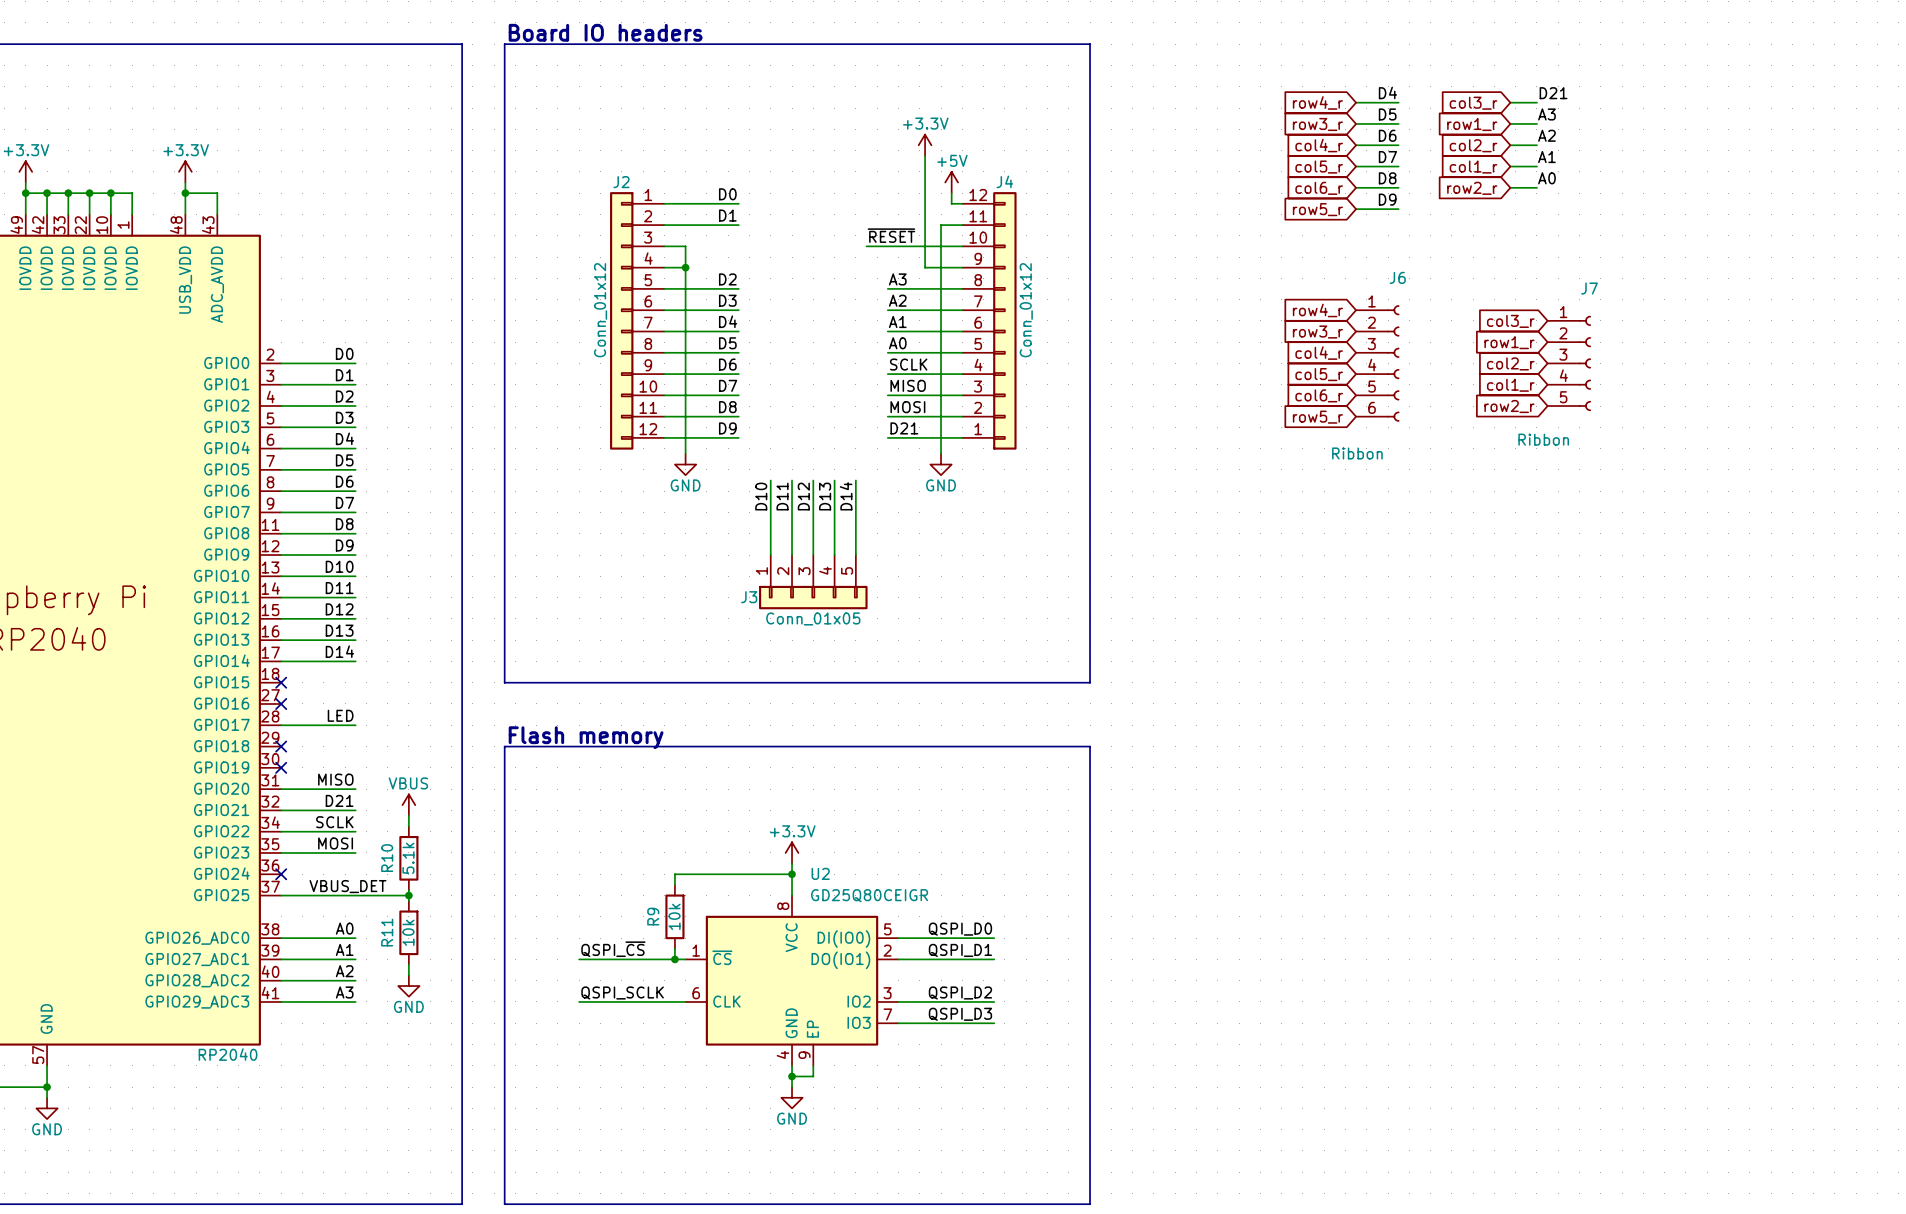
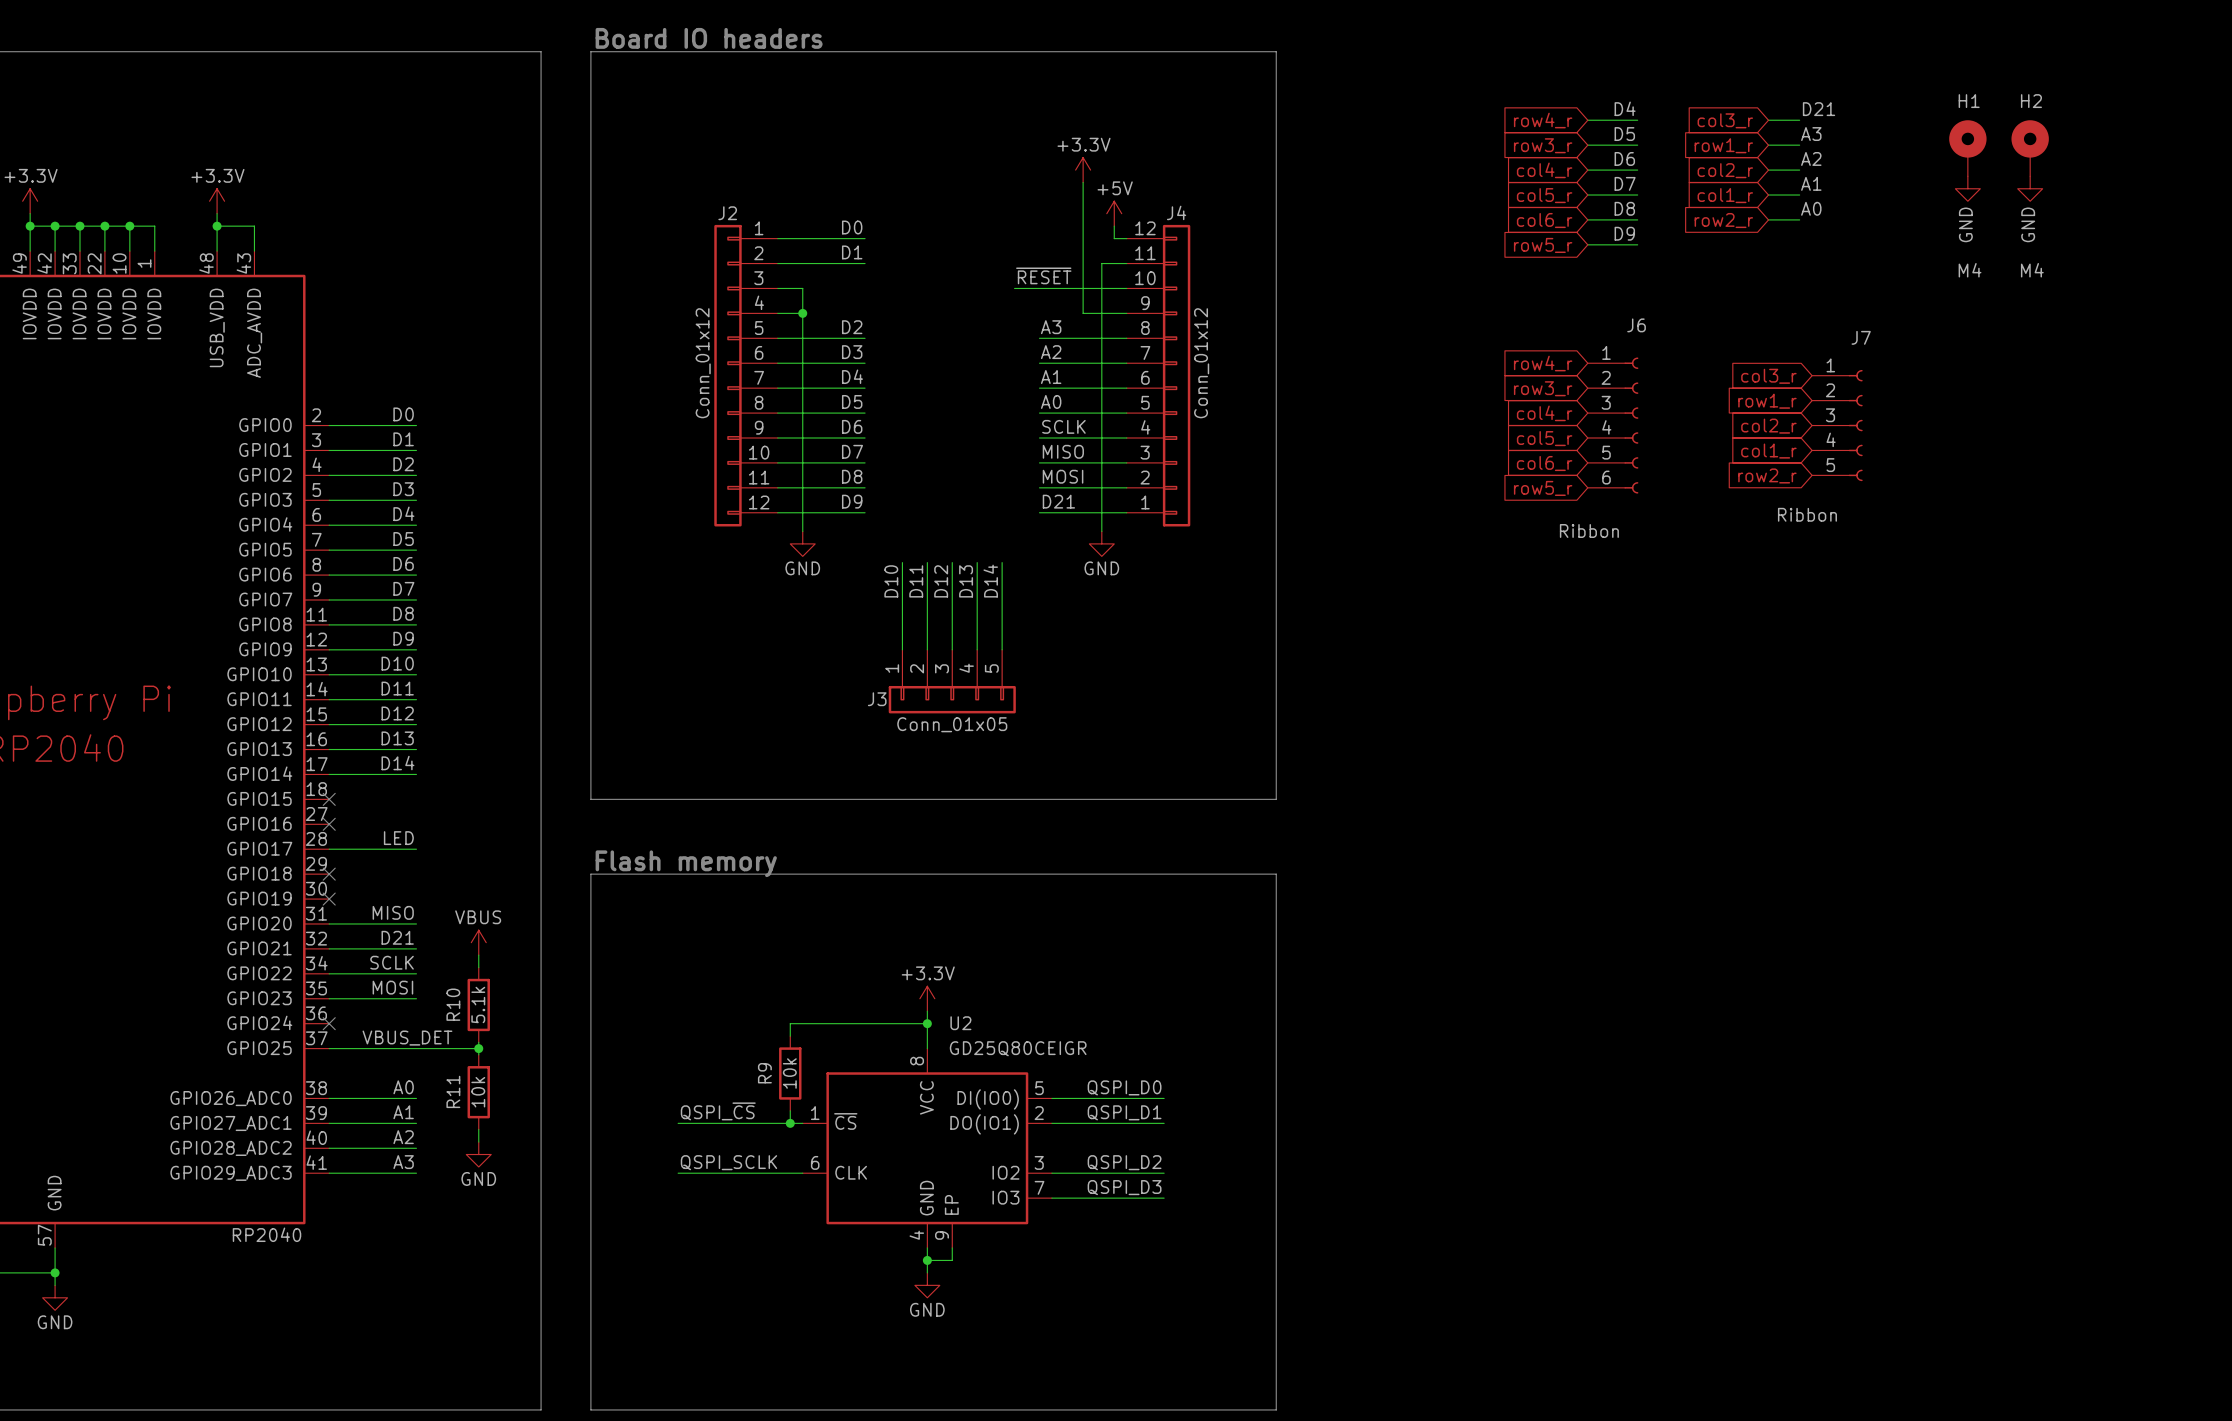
H1: none -> M4 (1967, 148)
H2: none -> M4 (2030, 148)
power symbol: none -> GND (1967, 188)
power symbol: none -> GND (2030, 188)

